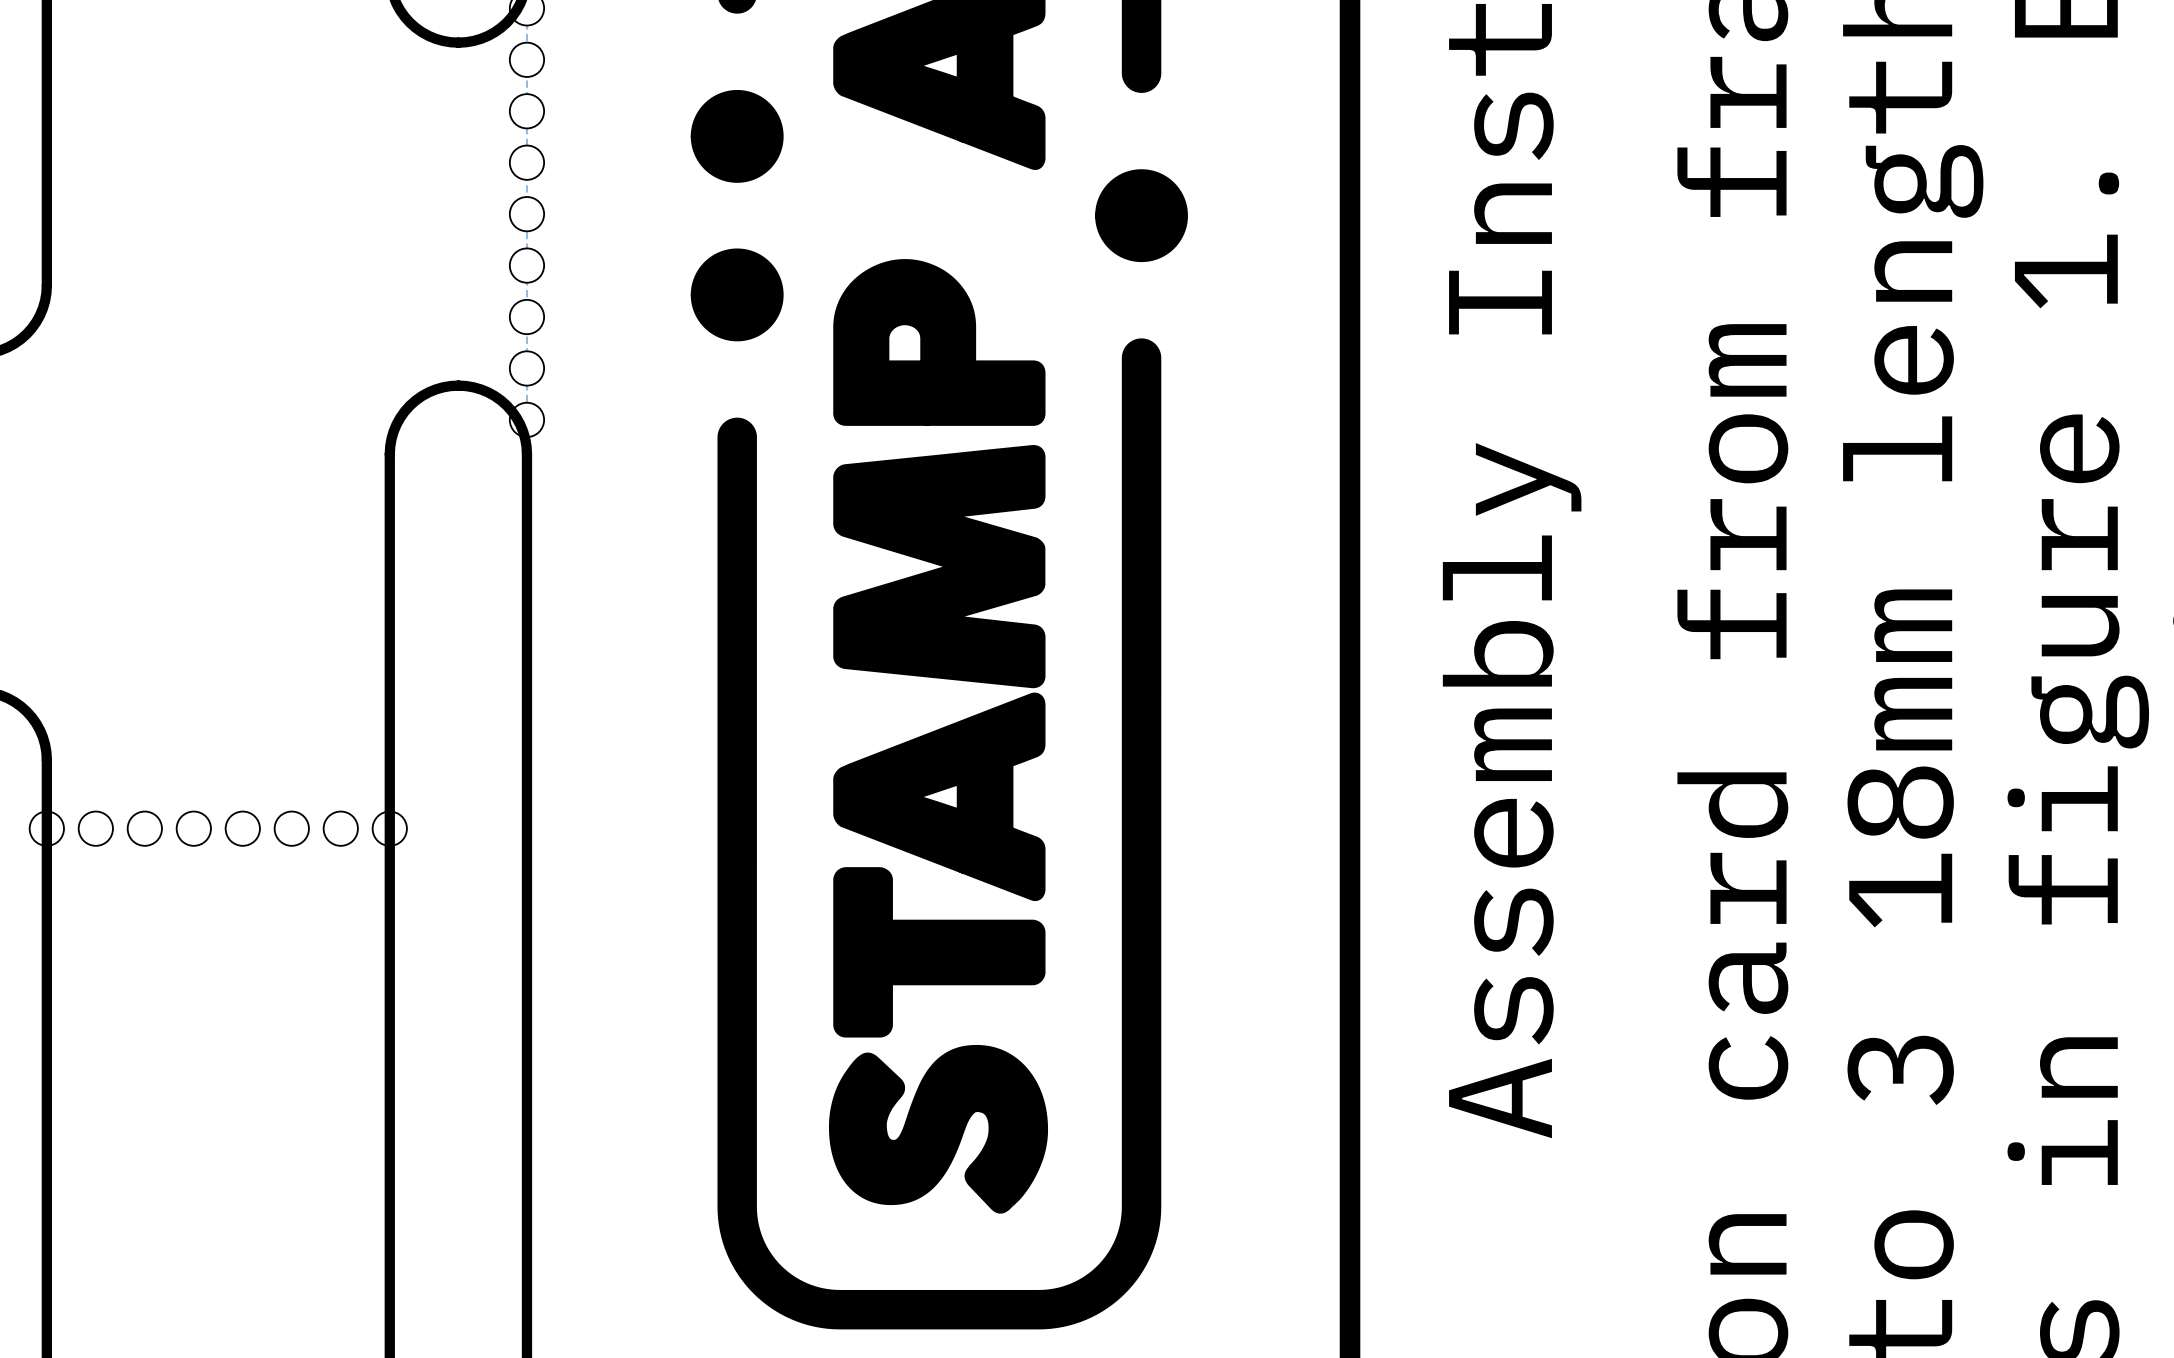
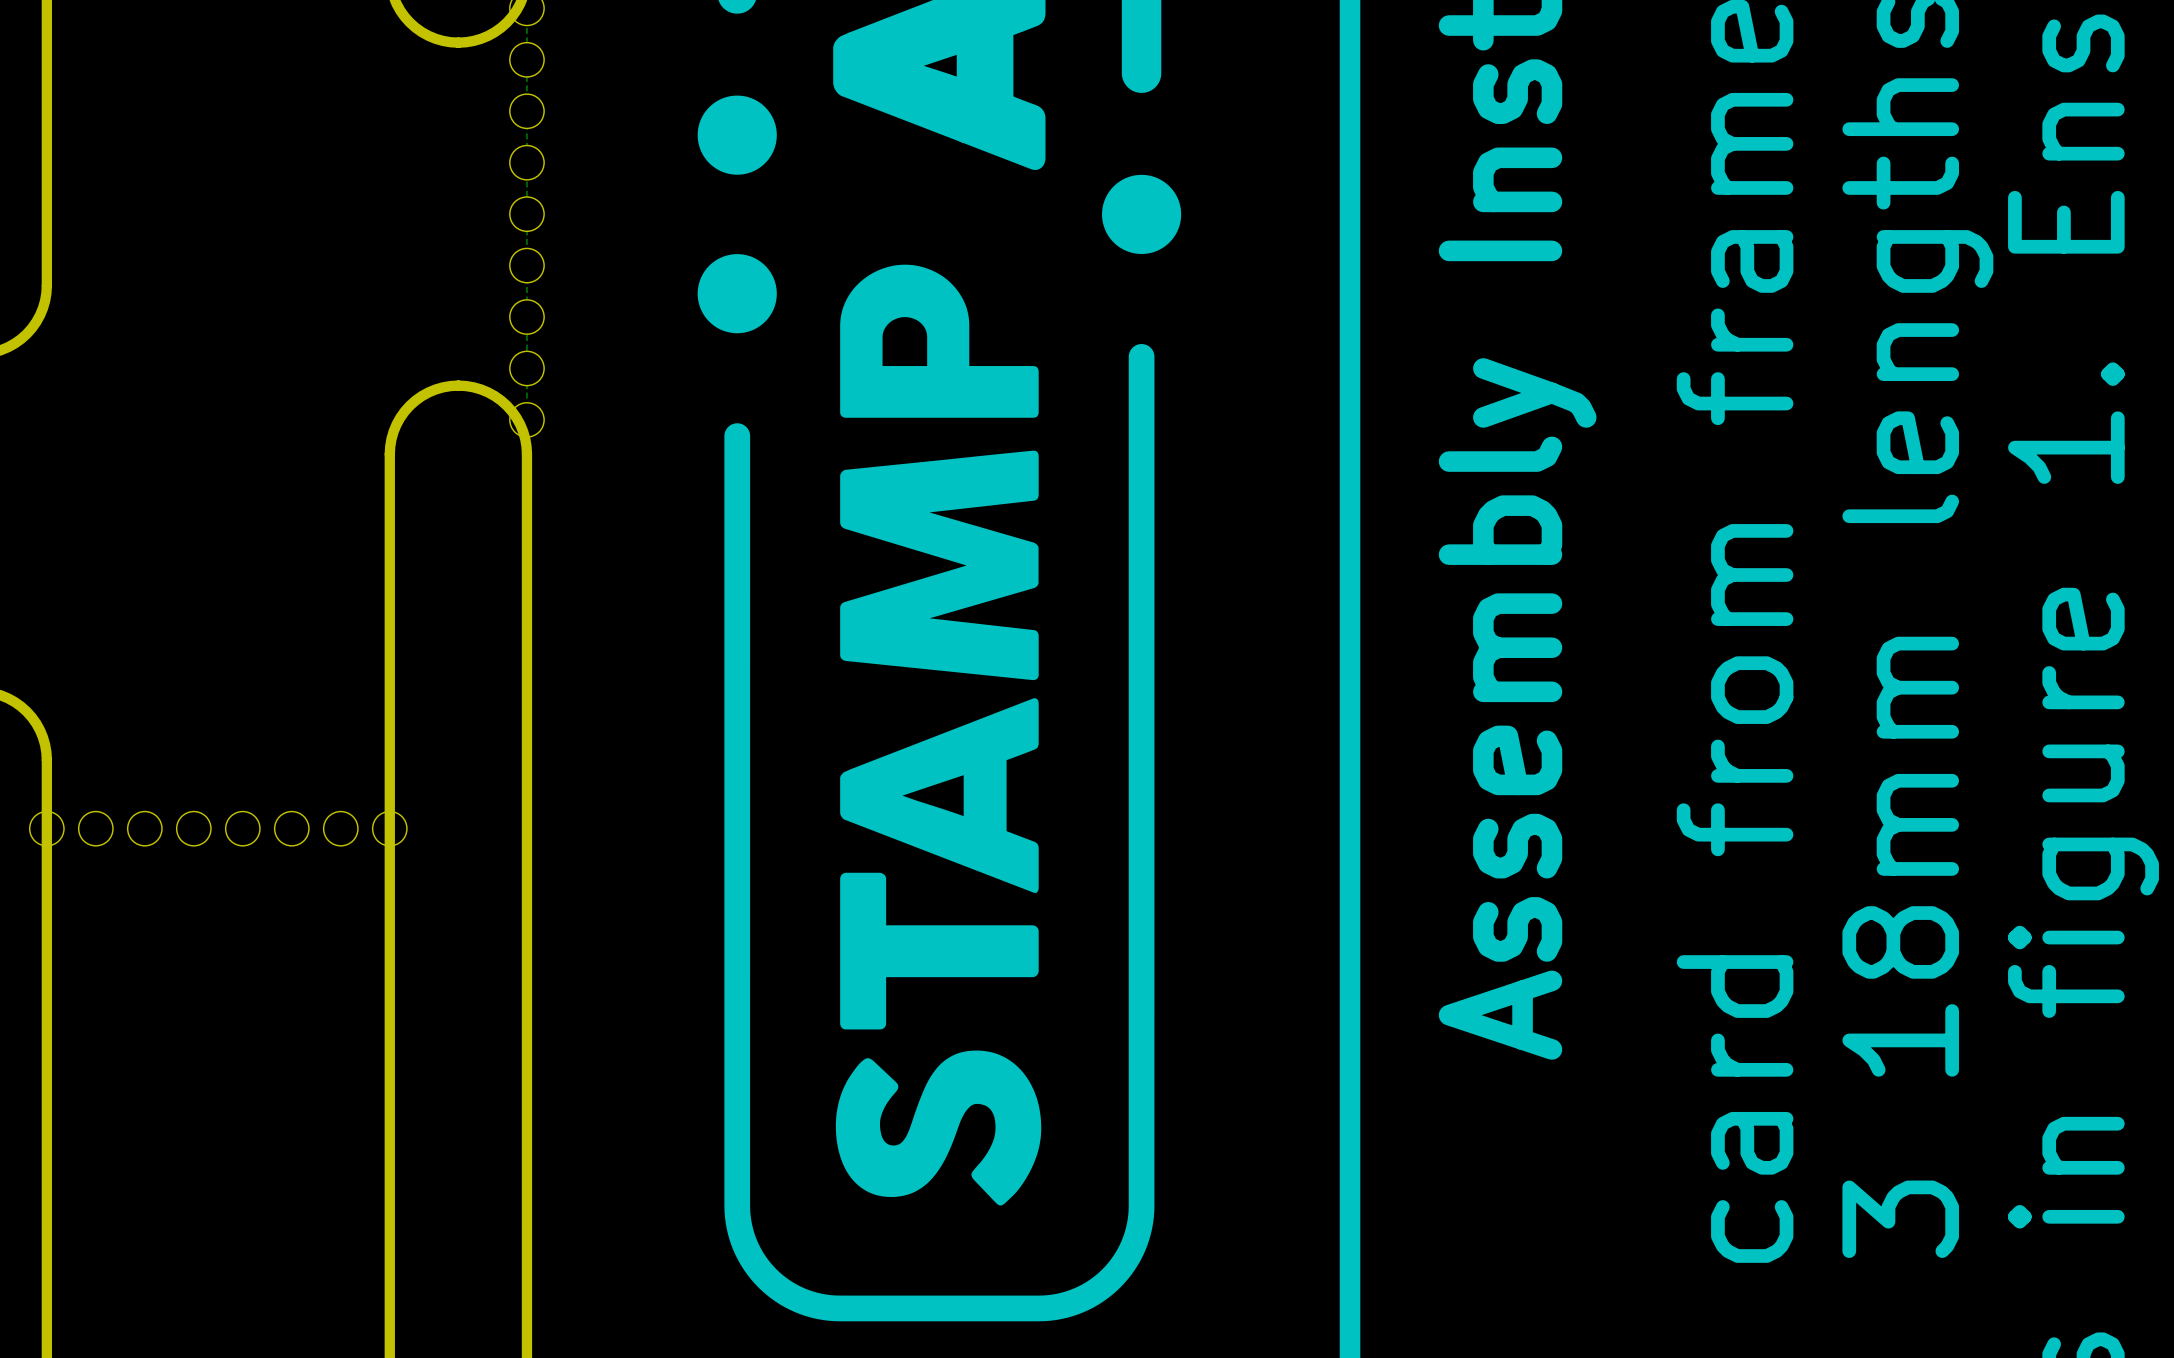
drawing shape: [690, 89, 784, 183] -> [697, 95, 777, 175]
drawing shape: [1095, 169, 1188, 263] -> [1102, 174, 1182, 254]
drawing shape: [690, 248, 784, 342] -> [697, 254, 777, 334]
drawing shape: [833, 259, 1046, 426] -> [840, 264, 1039, 418]
drawing shape: [717, 338, 1162, 1330] -> [724, 344, 1155, 1322]
drawing shape: [833, 445, 1046, 689] -> [840, 450, 1039, 681]
drawing shape: [833, 692, 1046, 902] -> [840, 698, 1039, 893]
drawing shape: [833, 867, 1046, 1038] -> [840, 872, 1039, 1030]
drawing shape: [828, 1044, 1049, 1214] -> [835, 1050, 1042, 1206]

